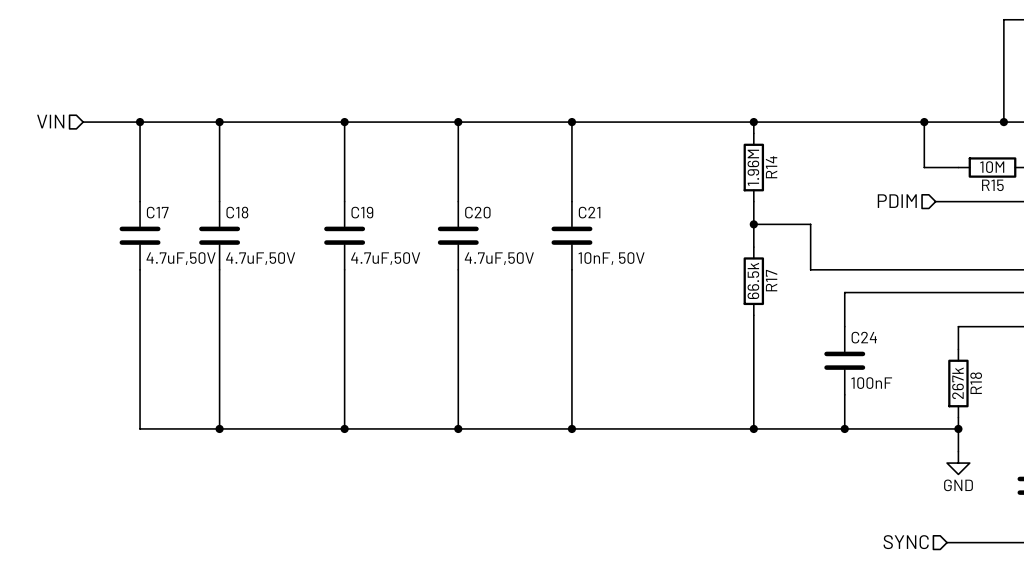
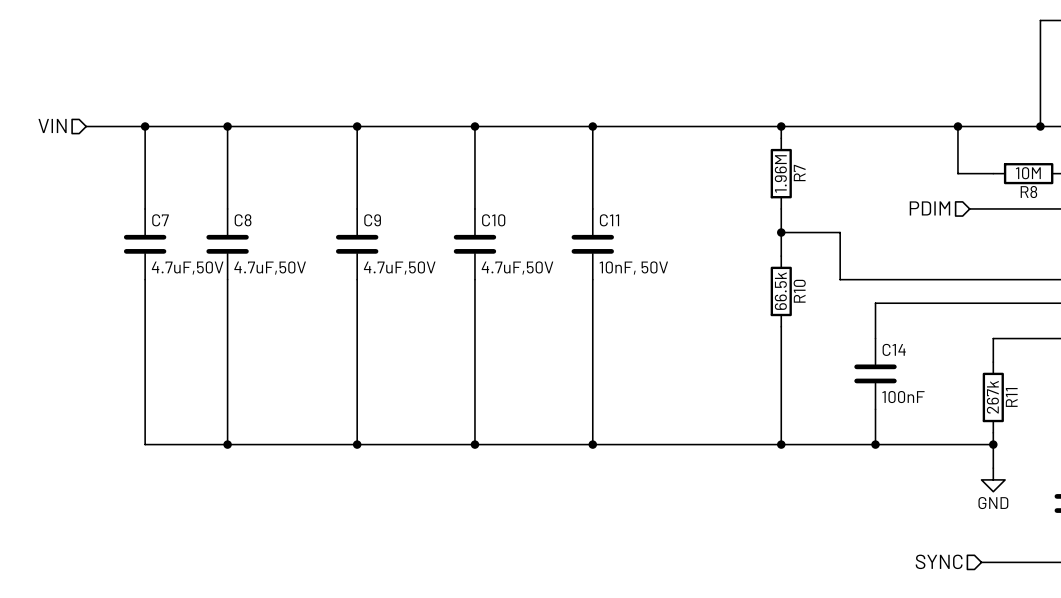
R14 name: R14 (771, 167) -> R7 (799, 173)
R15 name: R15 (992, 185) -> R8 (1028, 192)
C17 name: C17 (157, 212) -> C7 (160, 220)
C18 name: C18 (237, 212) -> C8 (243, 220)
C19 name: C19 (362, 212) -> C9 (372, 220)
C20 name: C20 (477, 212) -> C10 (493, 220)
C21 name: C21 (589, 212) -> C11 (609, 220)
R17 name: R17 (771, 280) -> R10 (799, 291)
C24 name: C24 (864, 337) -> C14 (894, 349)
R18 name: R18 (976, 383) -> R11 (1011, 397)

